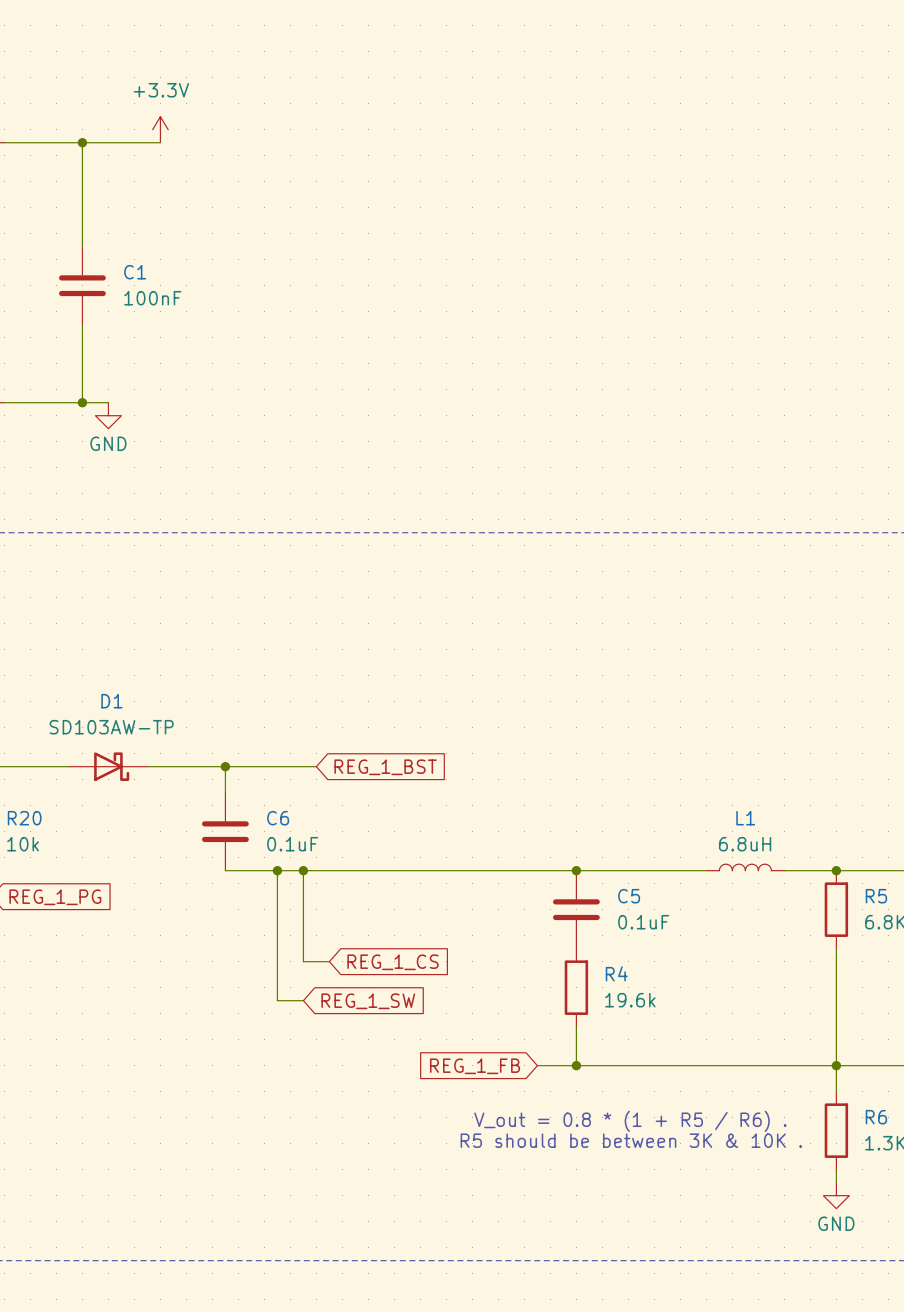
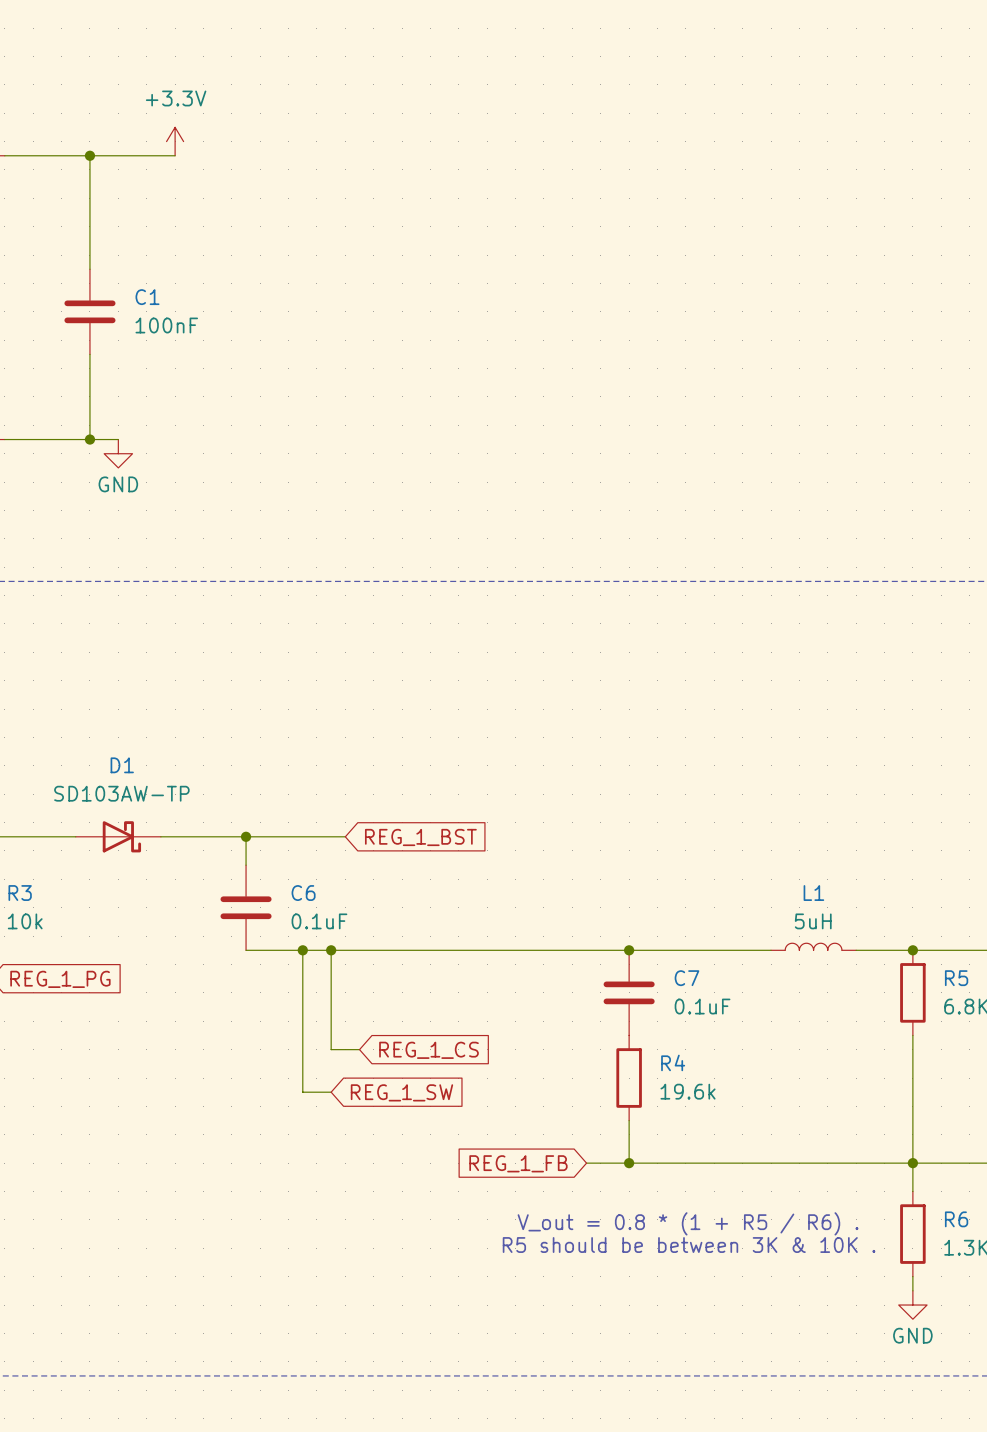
R20 name: R20 (24, 818) -> R3 (20, 893)
L1 value: 6.8uH (745, 844) -> 5uH (813, 921)
C5 name: C5 (629, 896) -> C7 (687, 978)

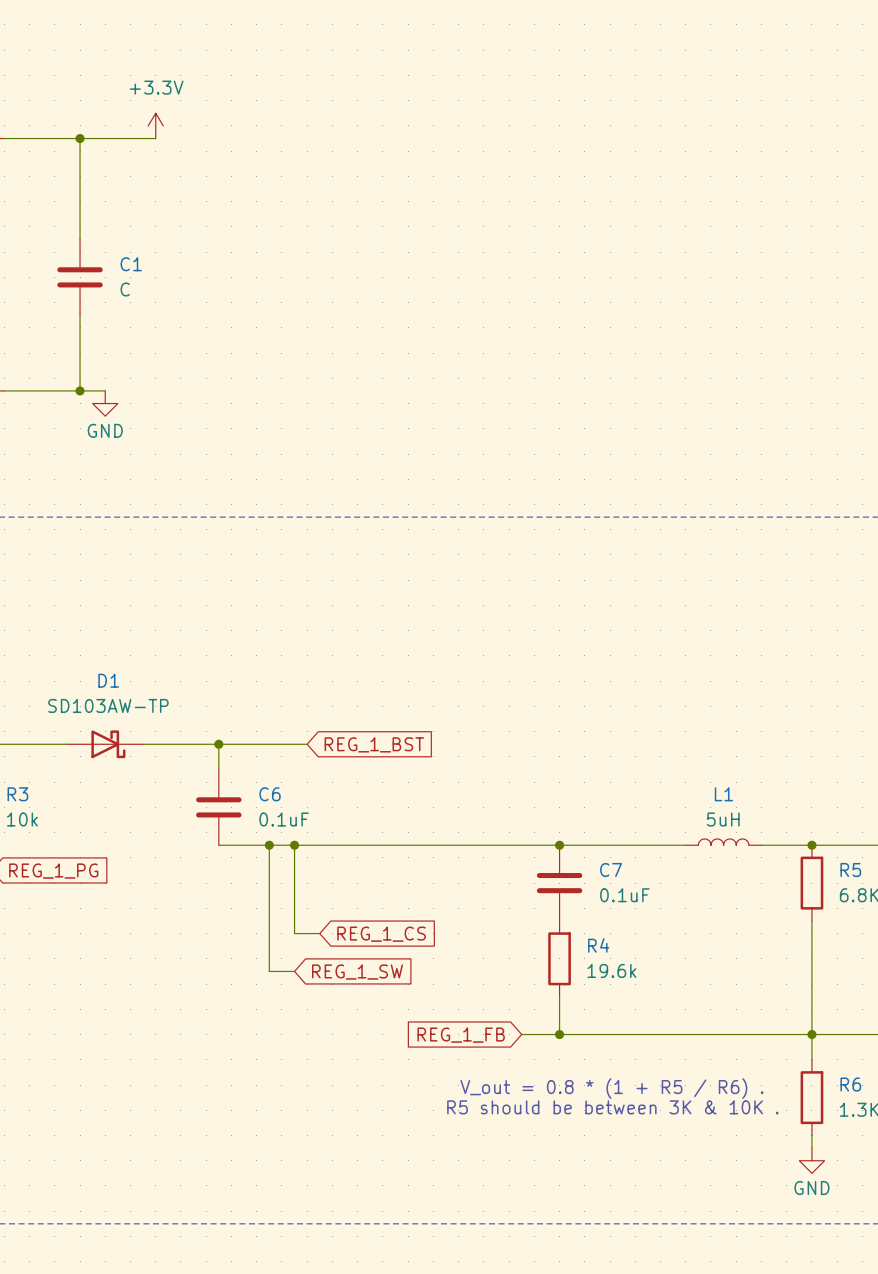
C1 value: 100nF (166, 325) -> C (125, 289)

